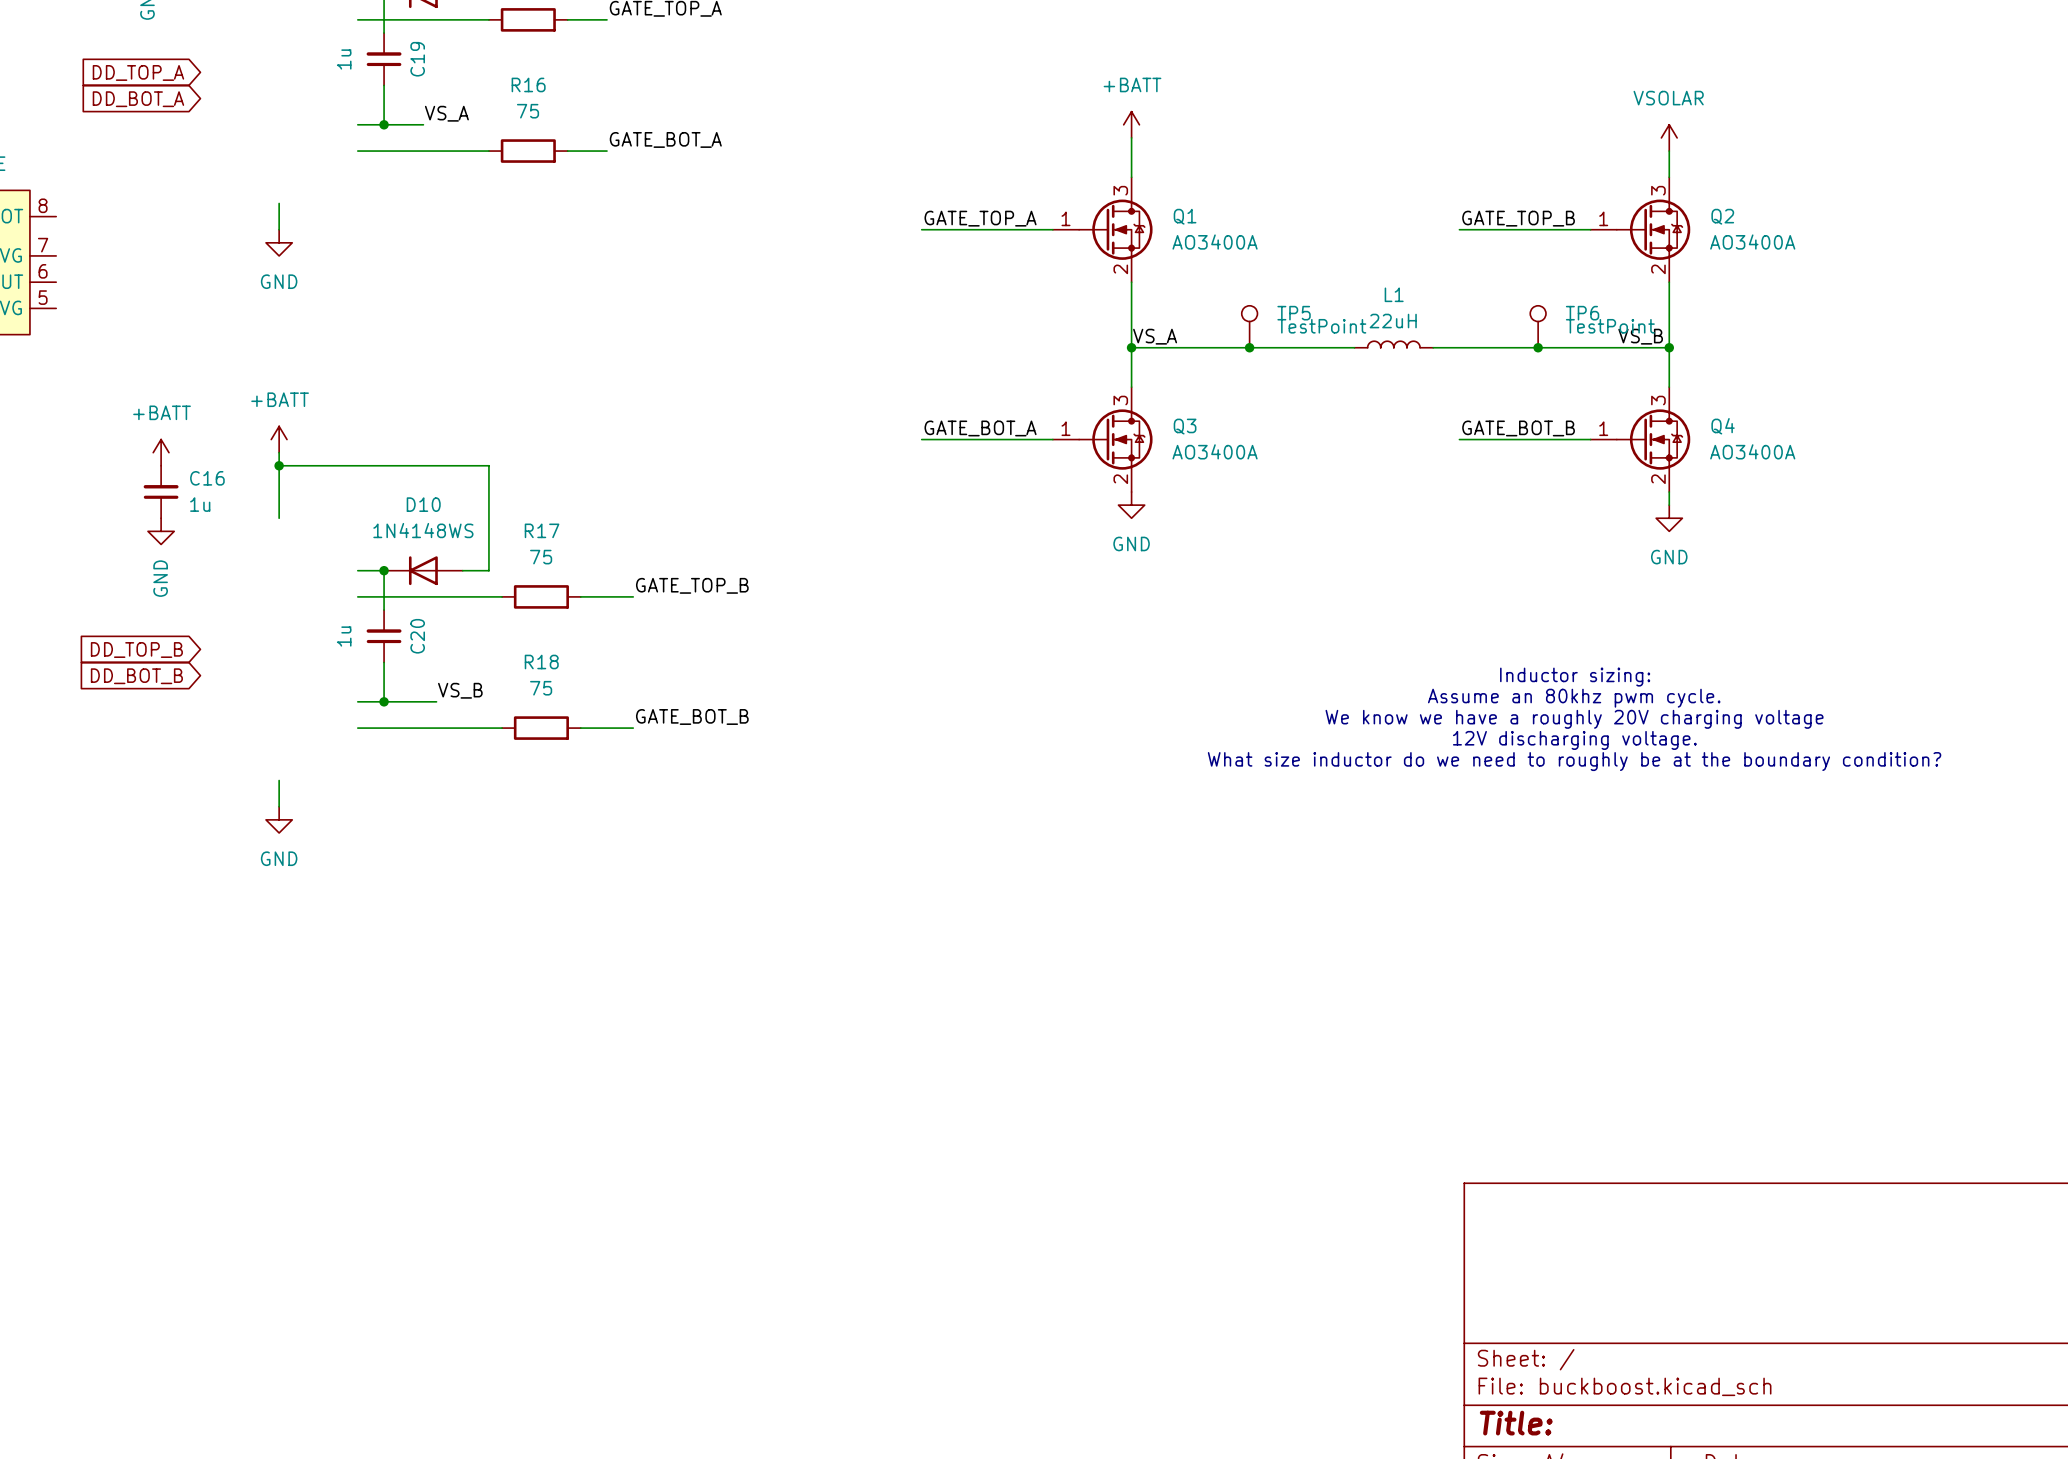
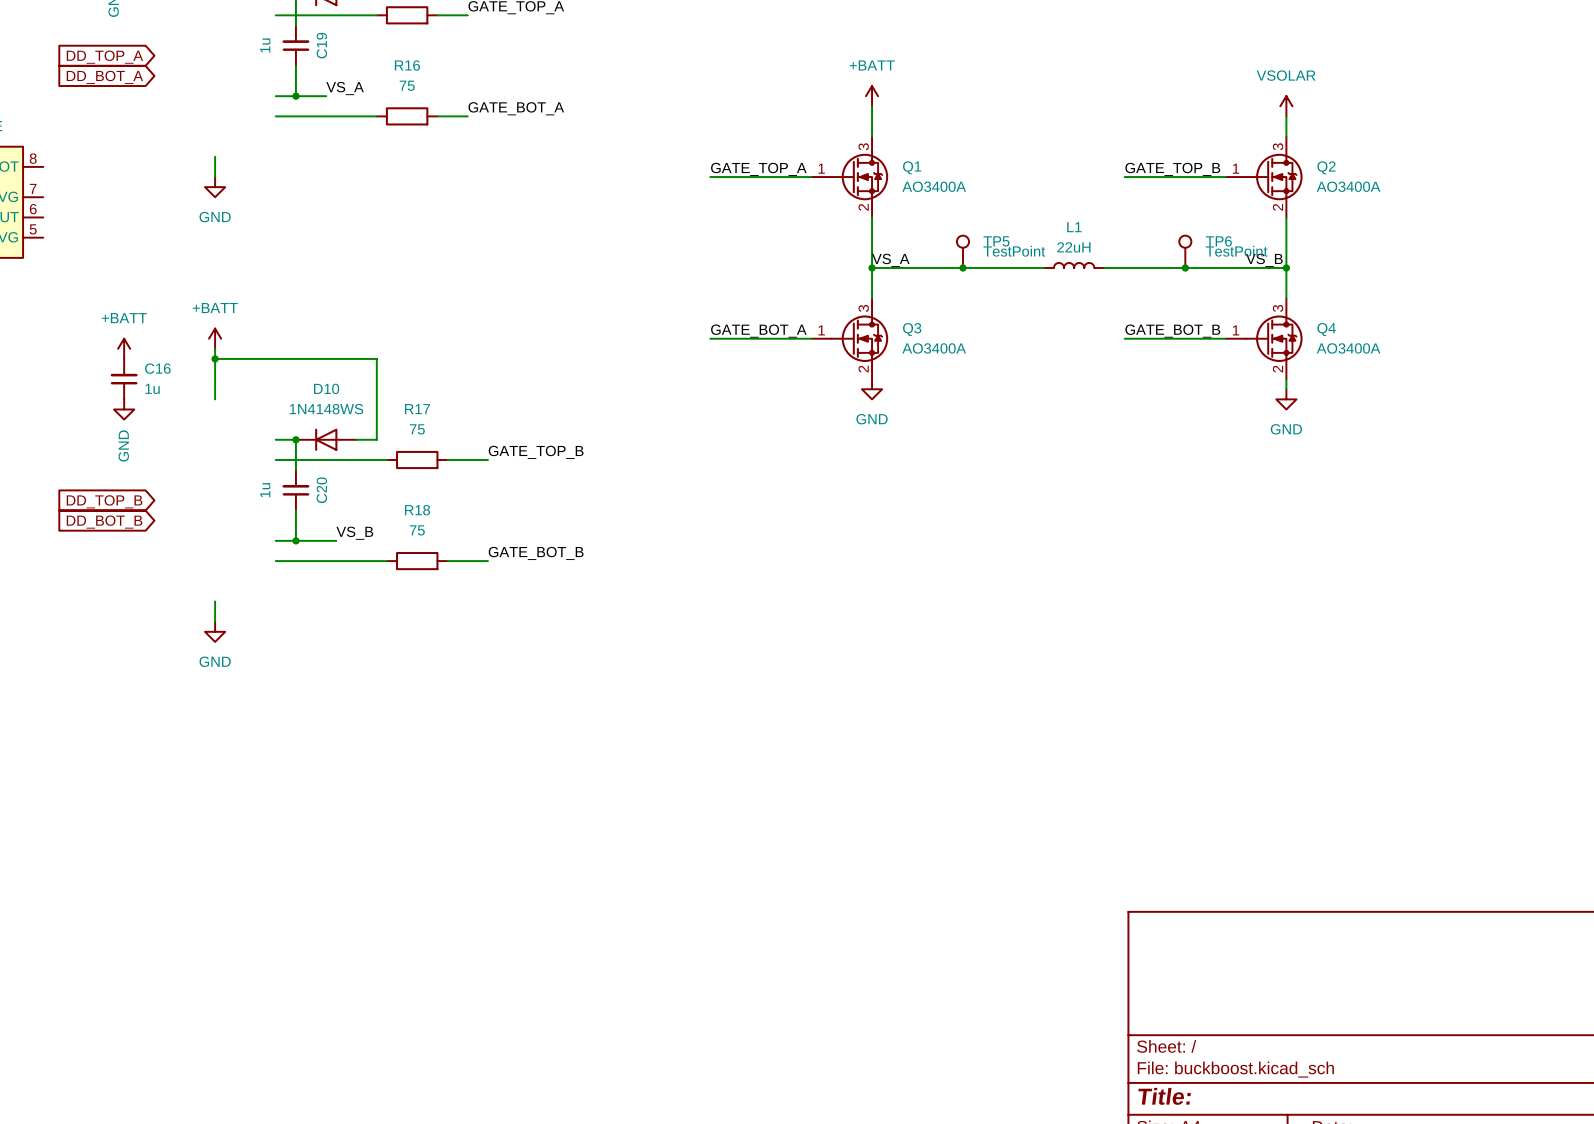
text: Inductor sizing: (1575, 677) -> none
text: Assume an 80khz pwm cycle. (1574, 698) -> none
text: We know we have a roughly 20V charging voltage (1574, 719) -> none
text: 12V discharging voltage. (1574, 740) -> none
text: What size inductor do we need to roughly be at the boundary condition? (1574, 761) -> none

